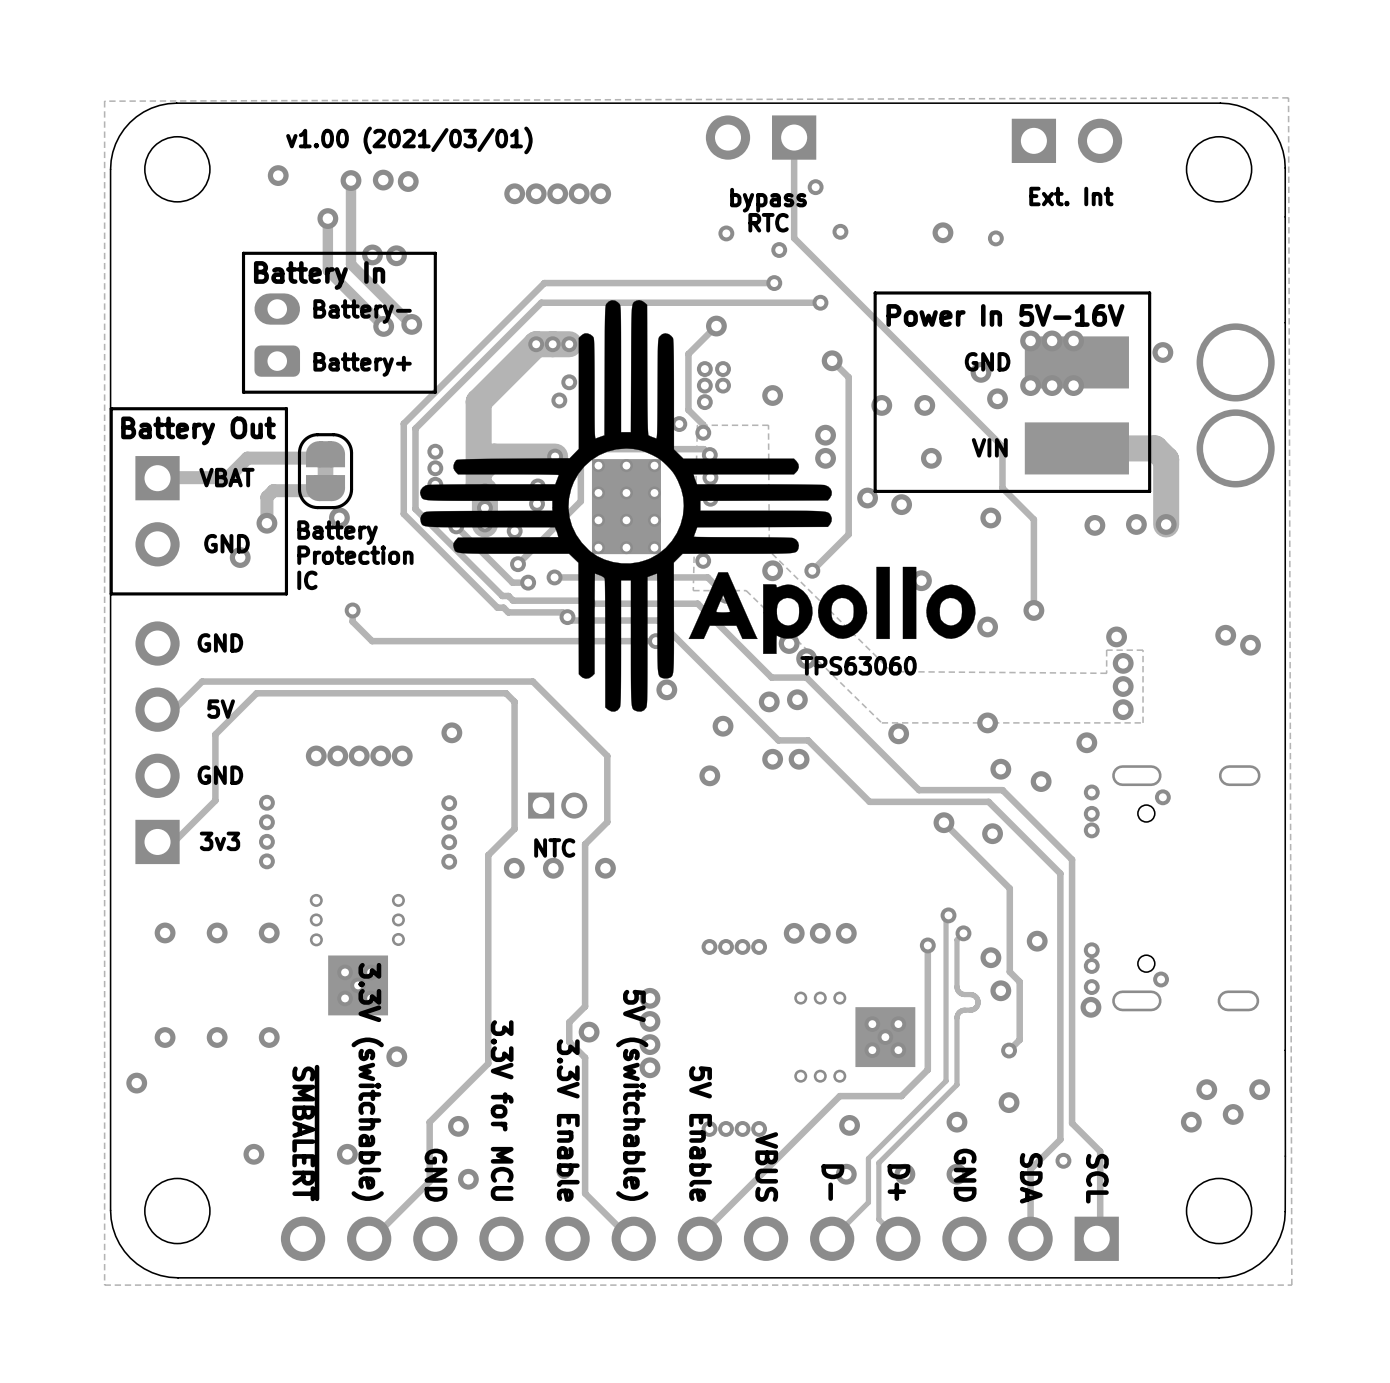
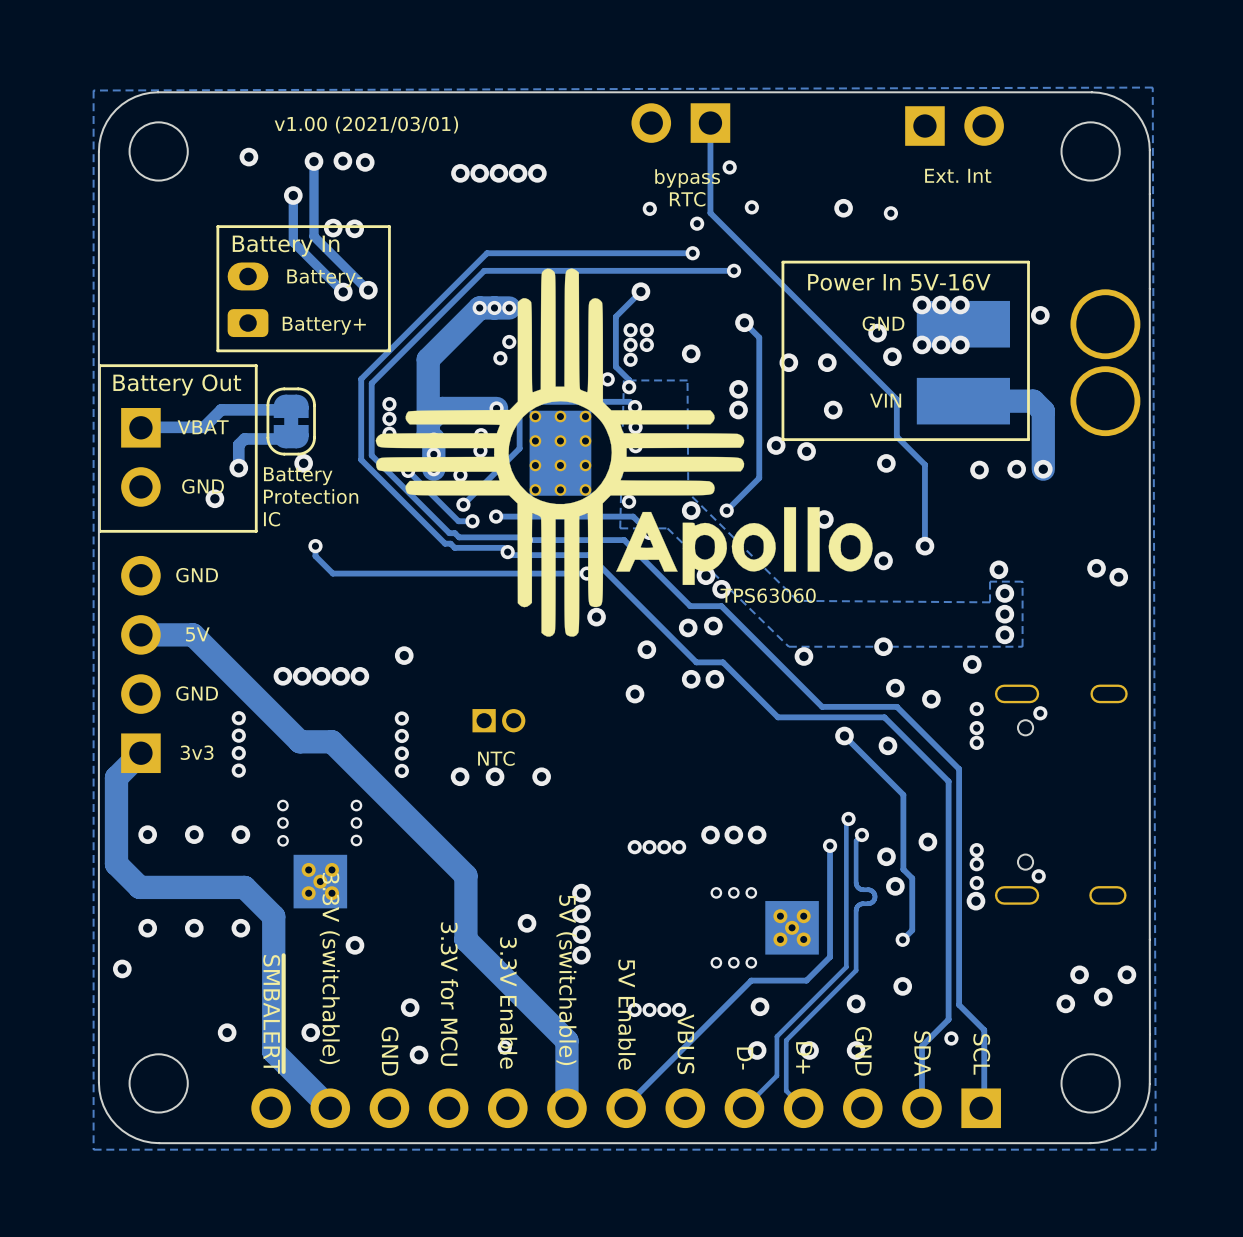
track: none -> (140, 634) (193, 634) (299, 741) (331, 741) (465, 875) (465, 939) (566, 1040) (566, 1108)
track: (174, 709) (202, 681) (532, 681) (607, 755) (607, 822) (585, 844) (585, 1006) (569, 1022) (569, 1041) (585, 1057) (585, 1193) (633, 1242) -> none
track: none -> (140, 753) (116, 777) (116, 864) (139, 887) (244, 887) (273, 916) (273, 1051) (330, 1108)
track: (174, 841) (215, 800) (215, 734) (256, 693) (506, 693) (514, 701) (514, 828) (488, 855) (488, 1063) (429, 1122) (429, 1181) (369, 1242) -> none

